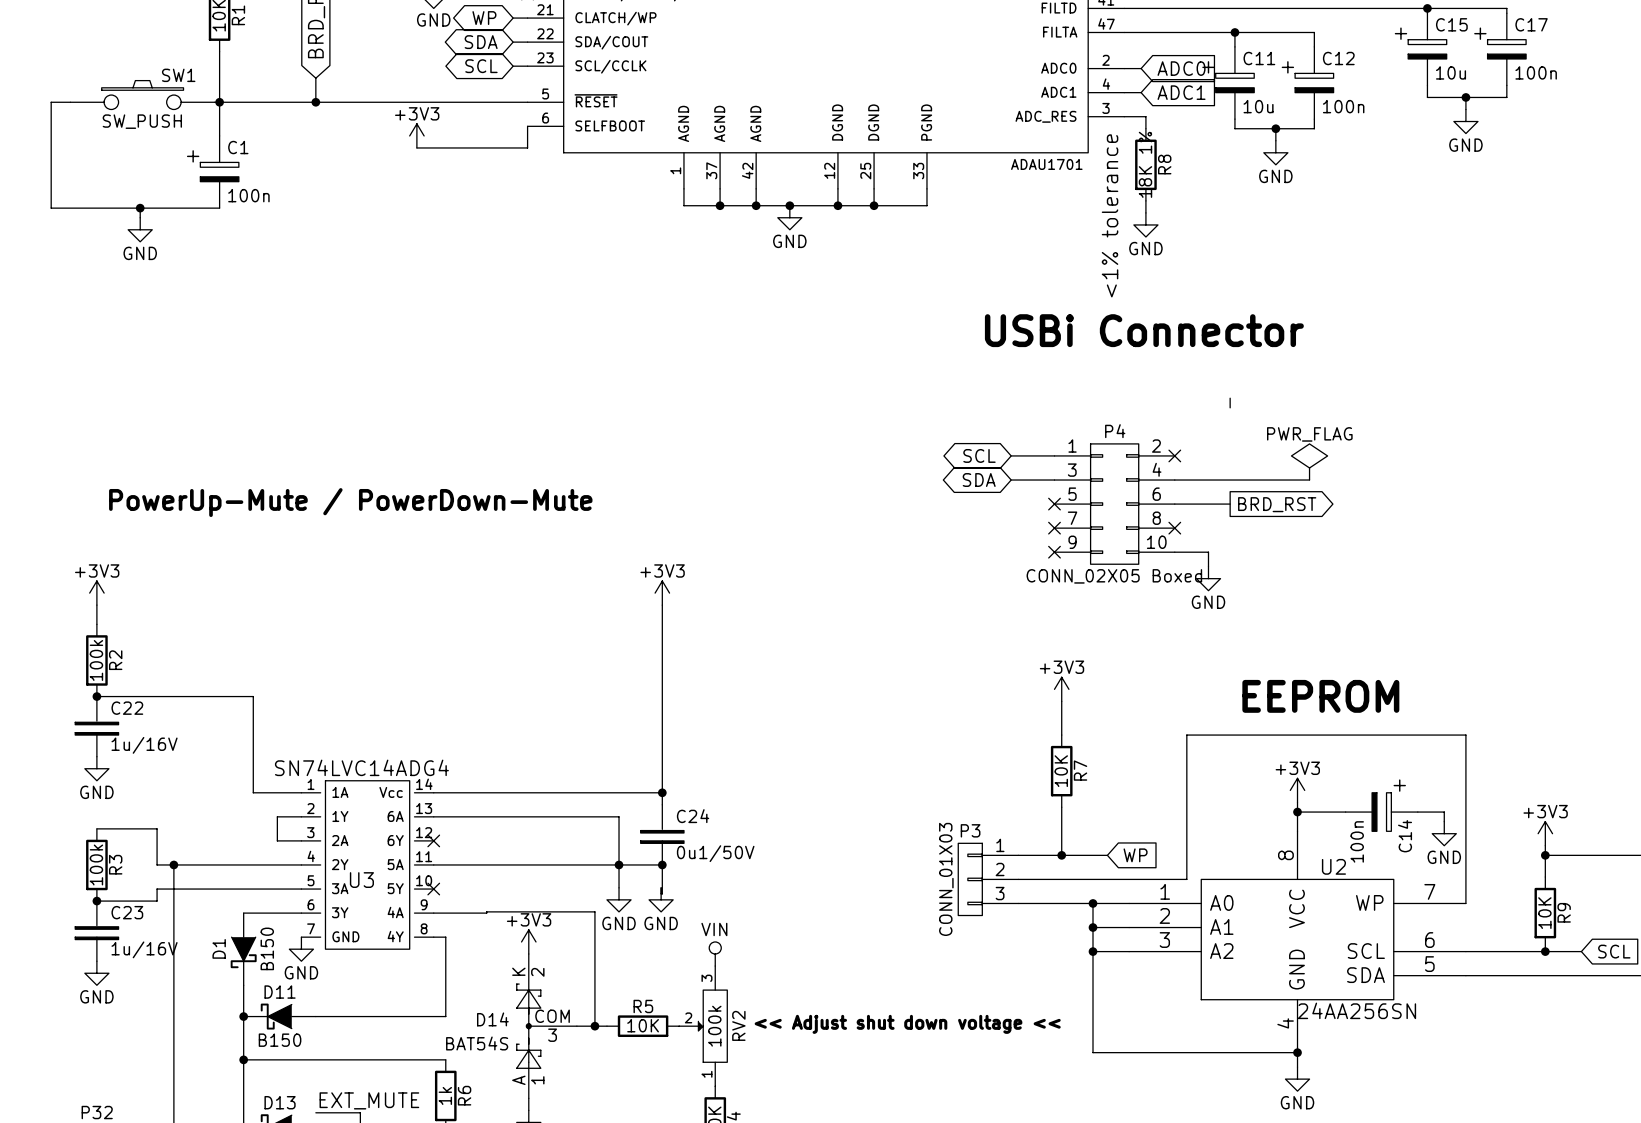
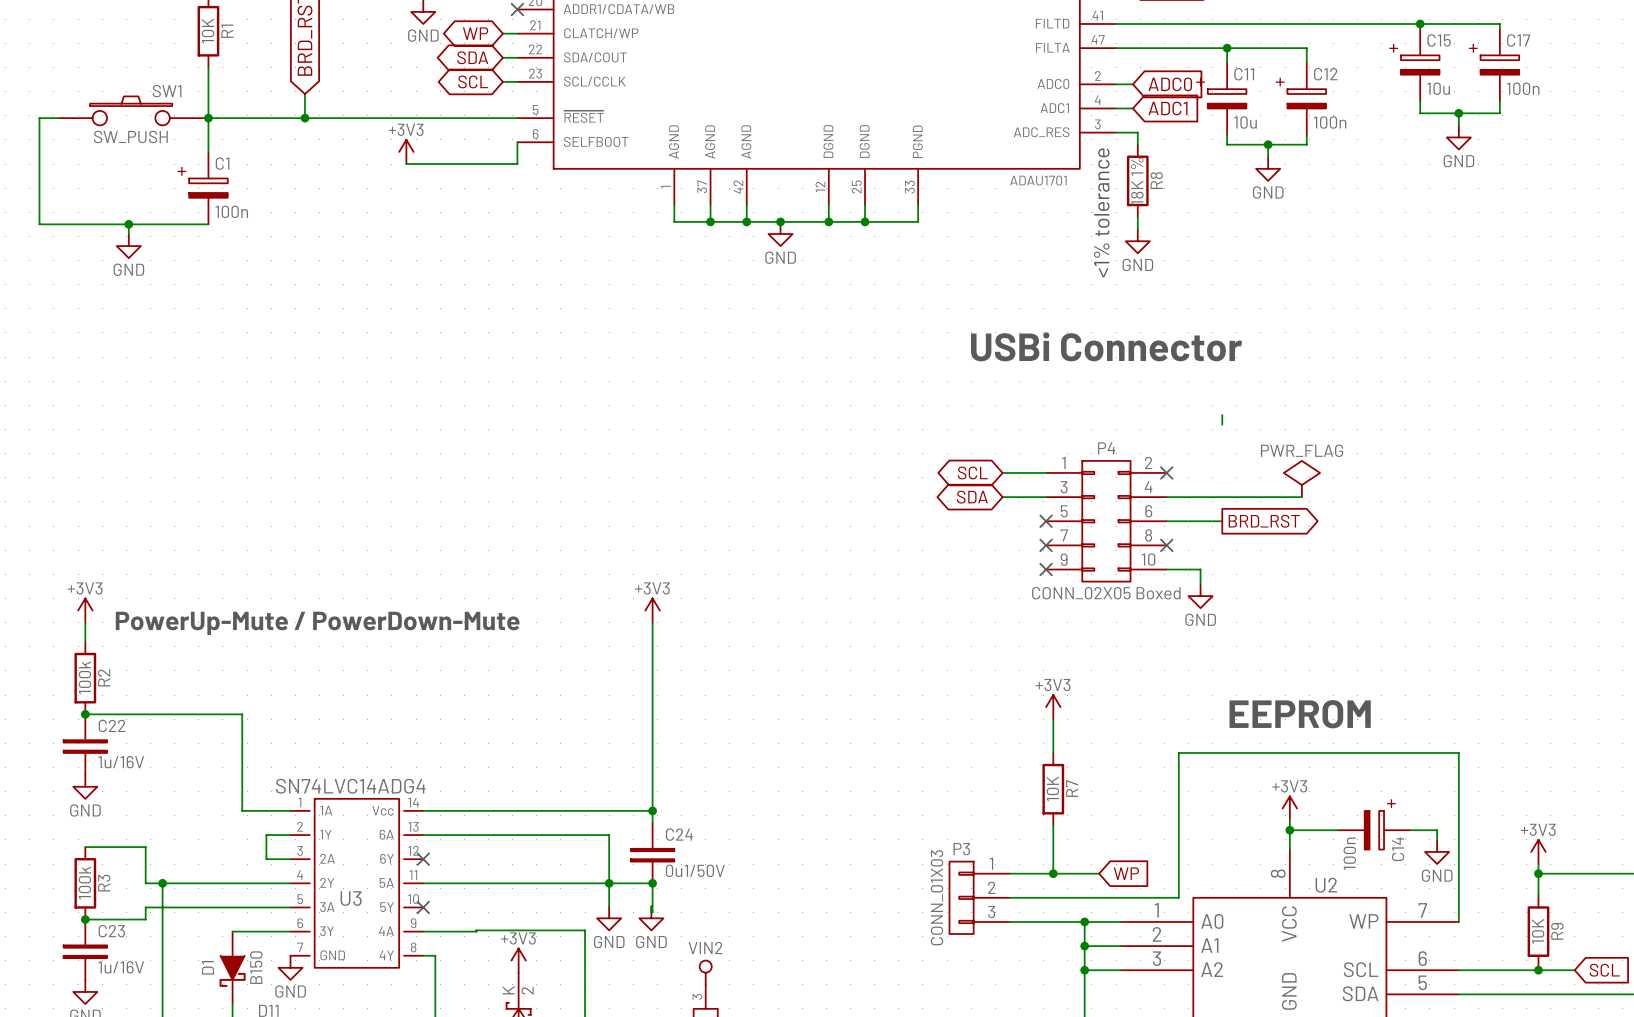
text position: PowerUp-Mute / PowerDown-Mute (350, 502) -> PowerUp-Mute / PowerDown-Mute (317, 623)
power symbol: VIN (715, 954) -> VIN2 (705, 972)

